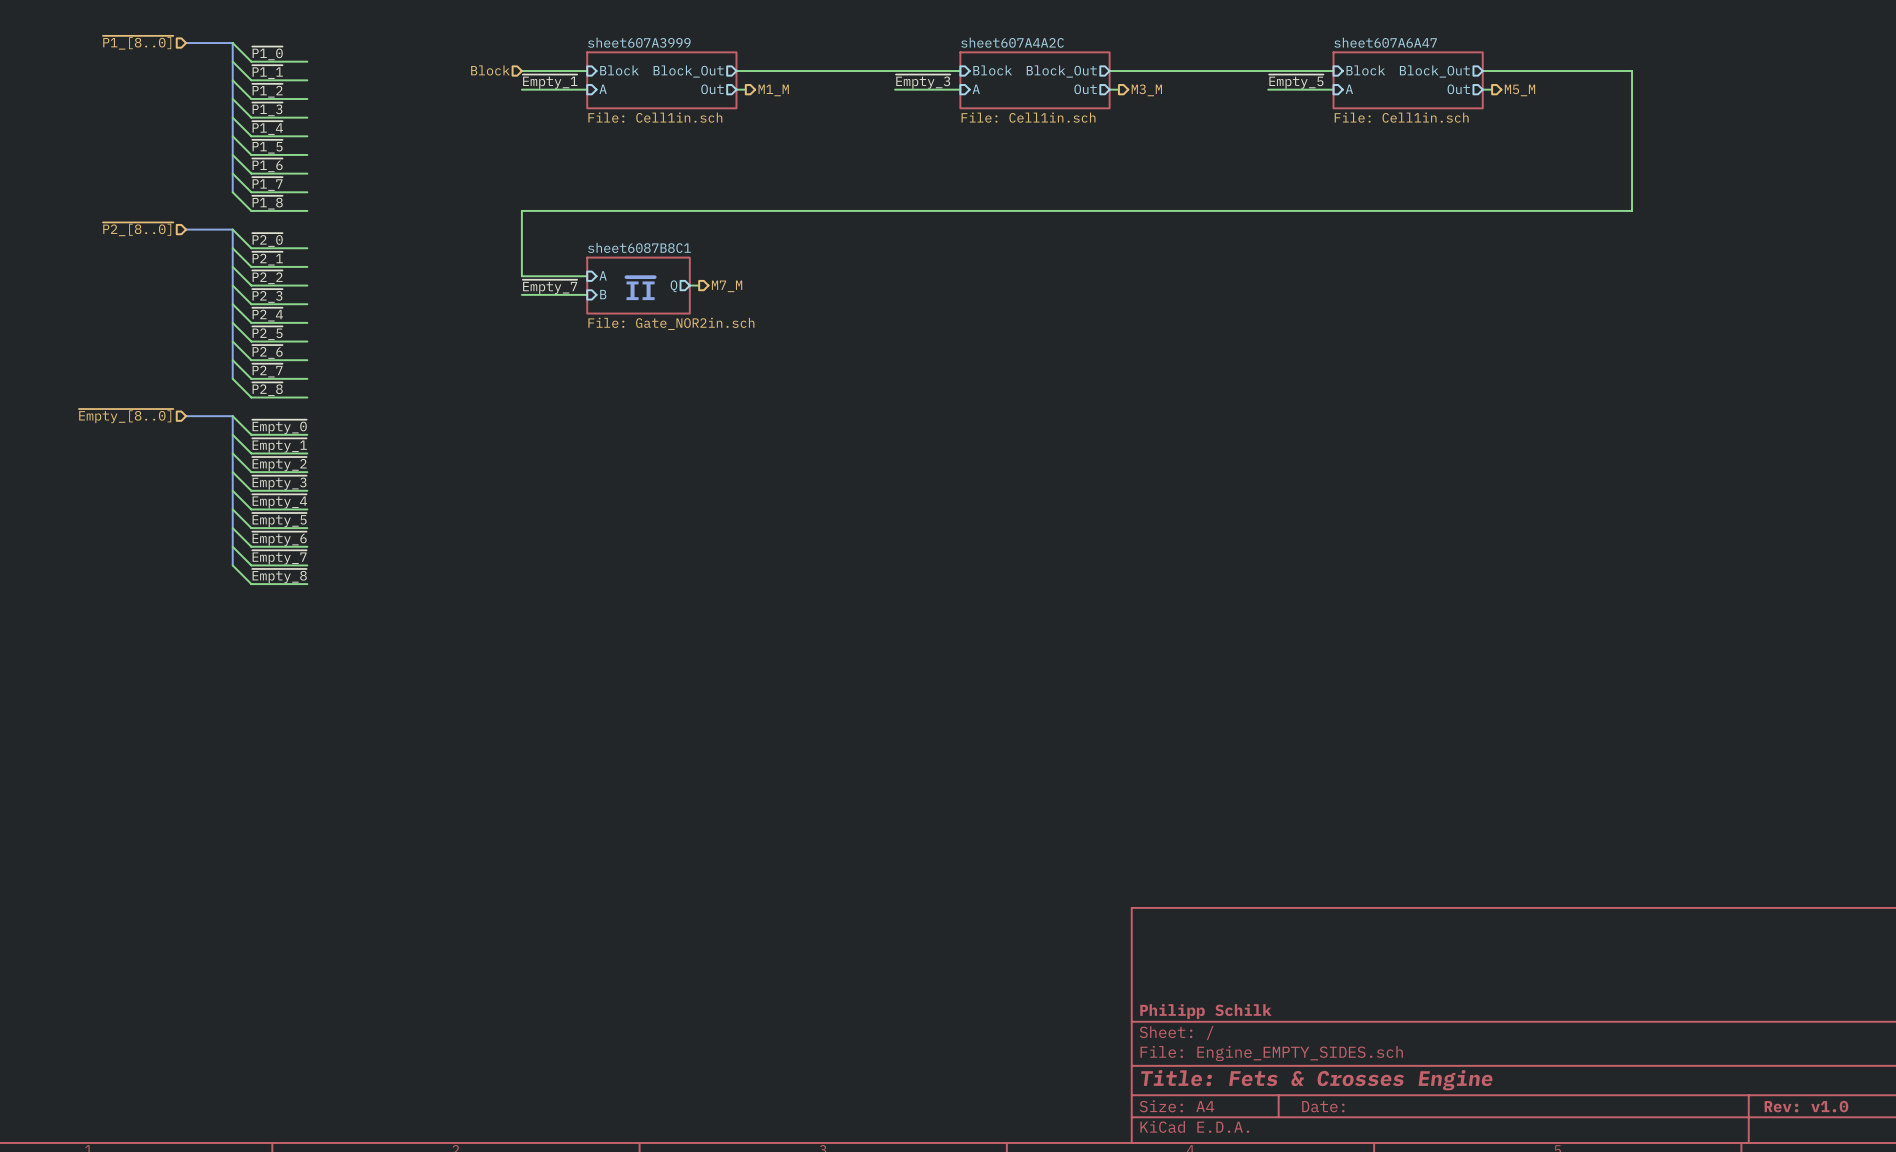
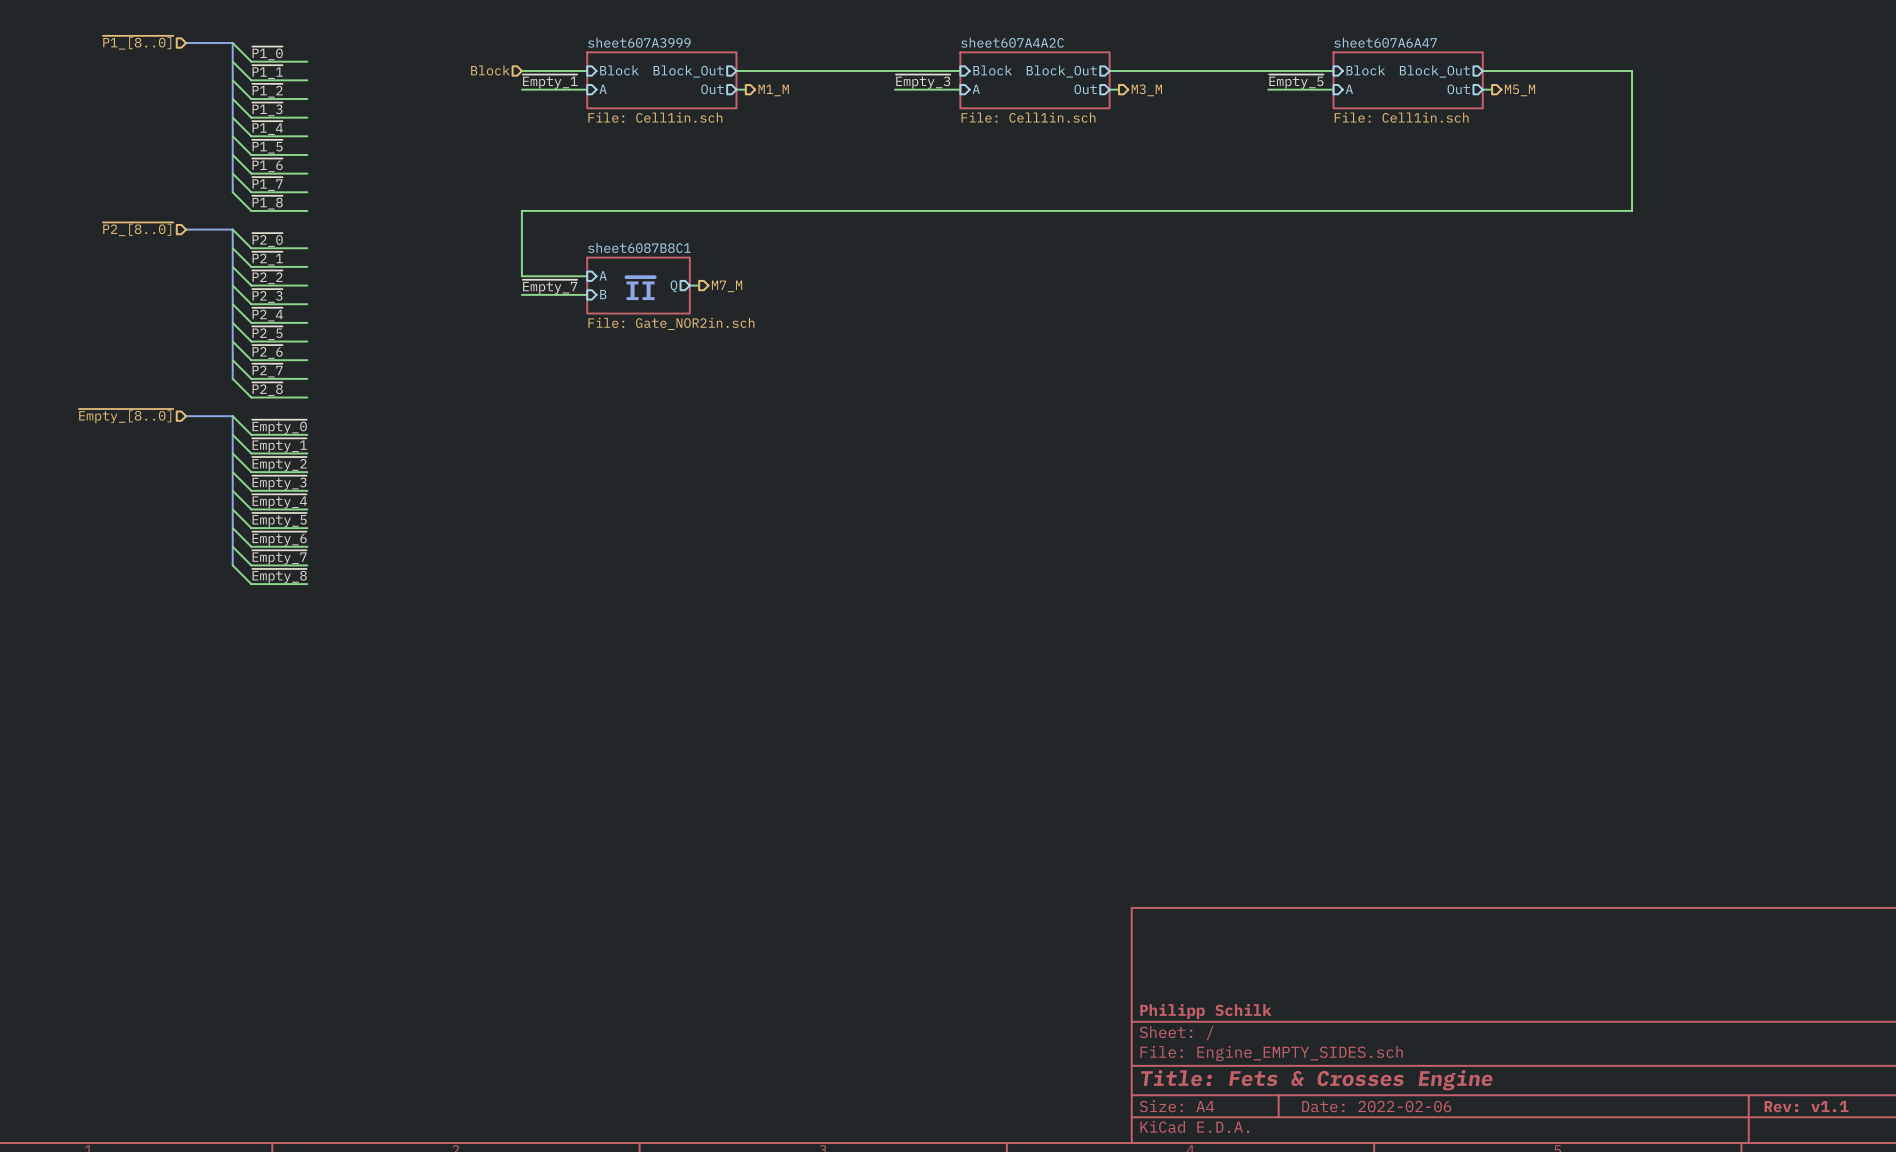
title block: Date: (1323, 1106) -> Date: 2022-02-06 (1376, 1106)
title block: Rev: v1.0 (1806, 1106) -> Rev: v1.1 (1806, 1106)

